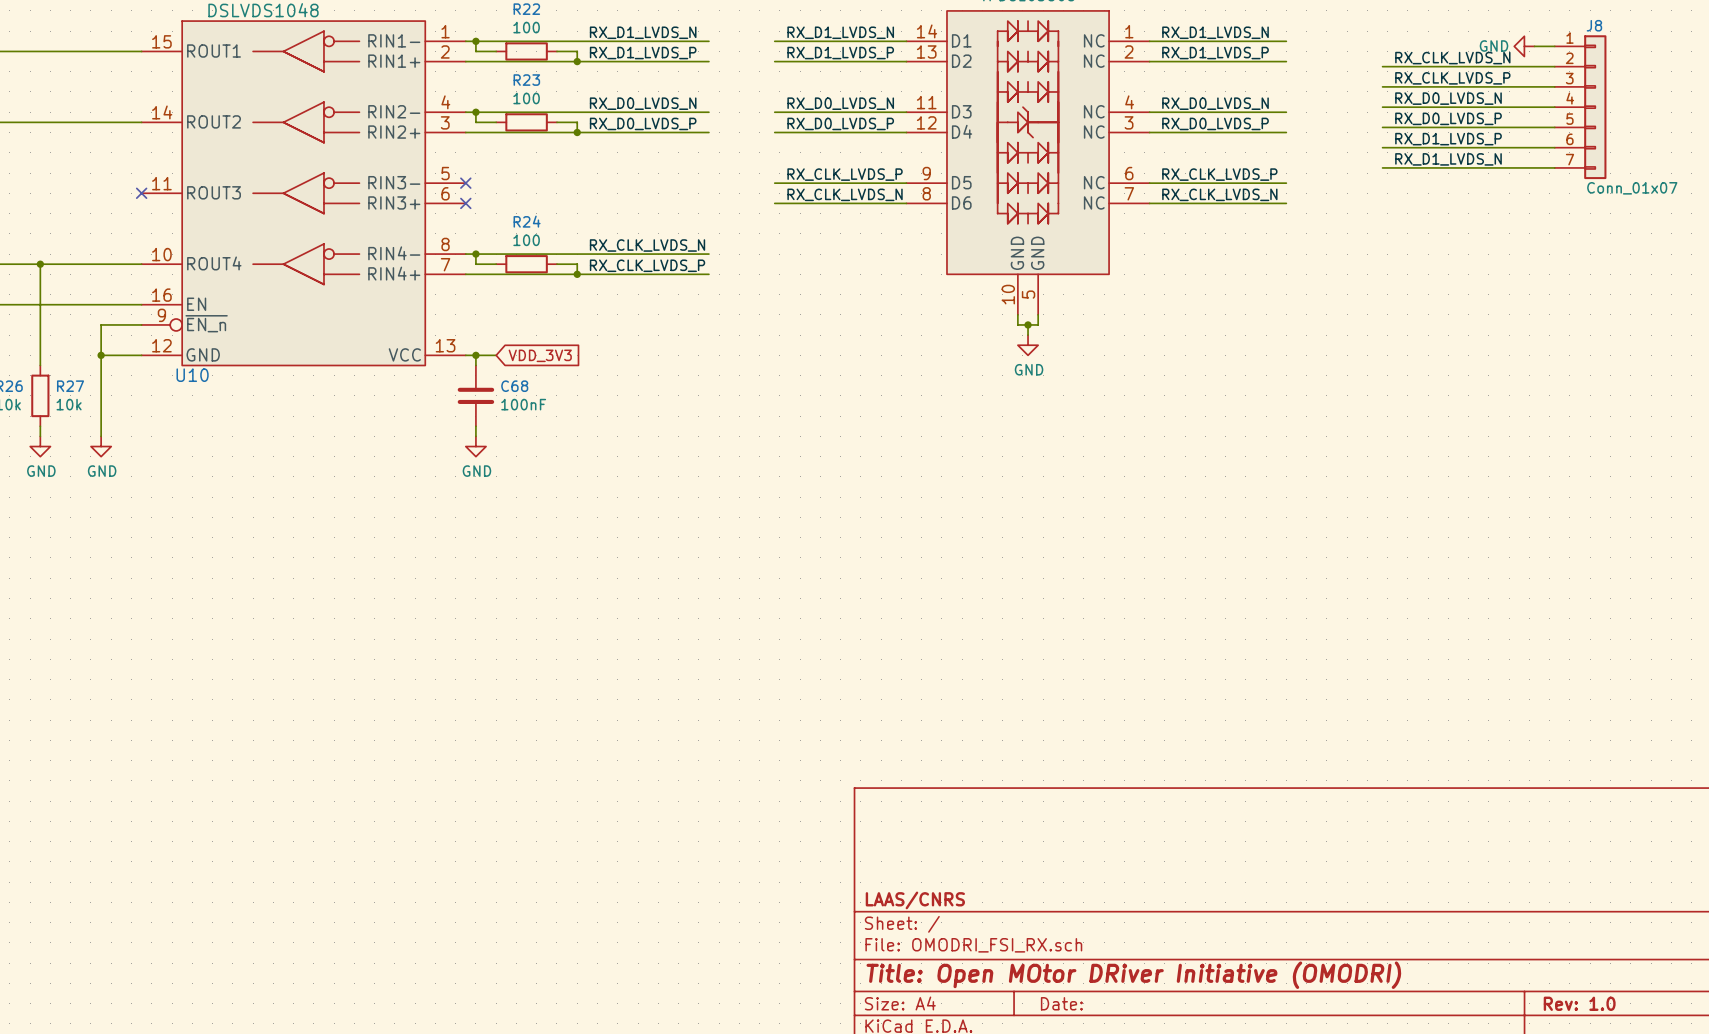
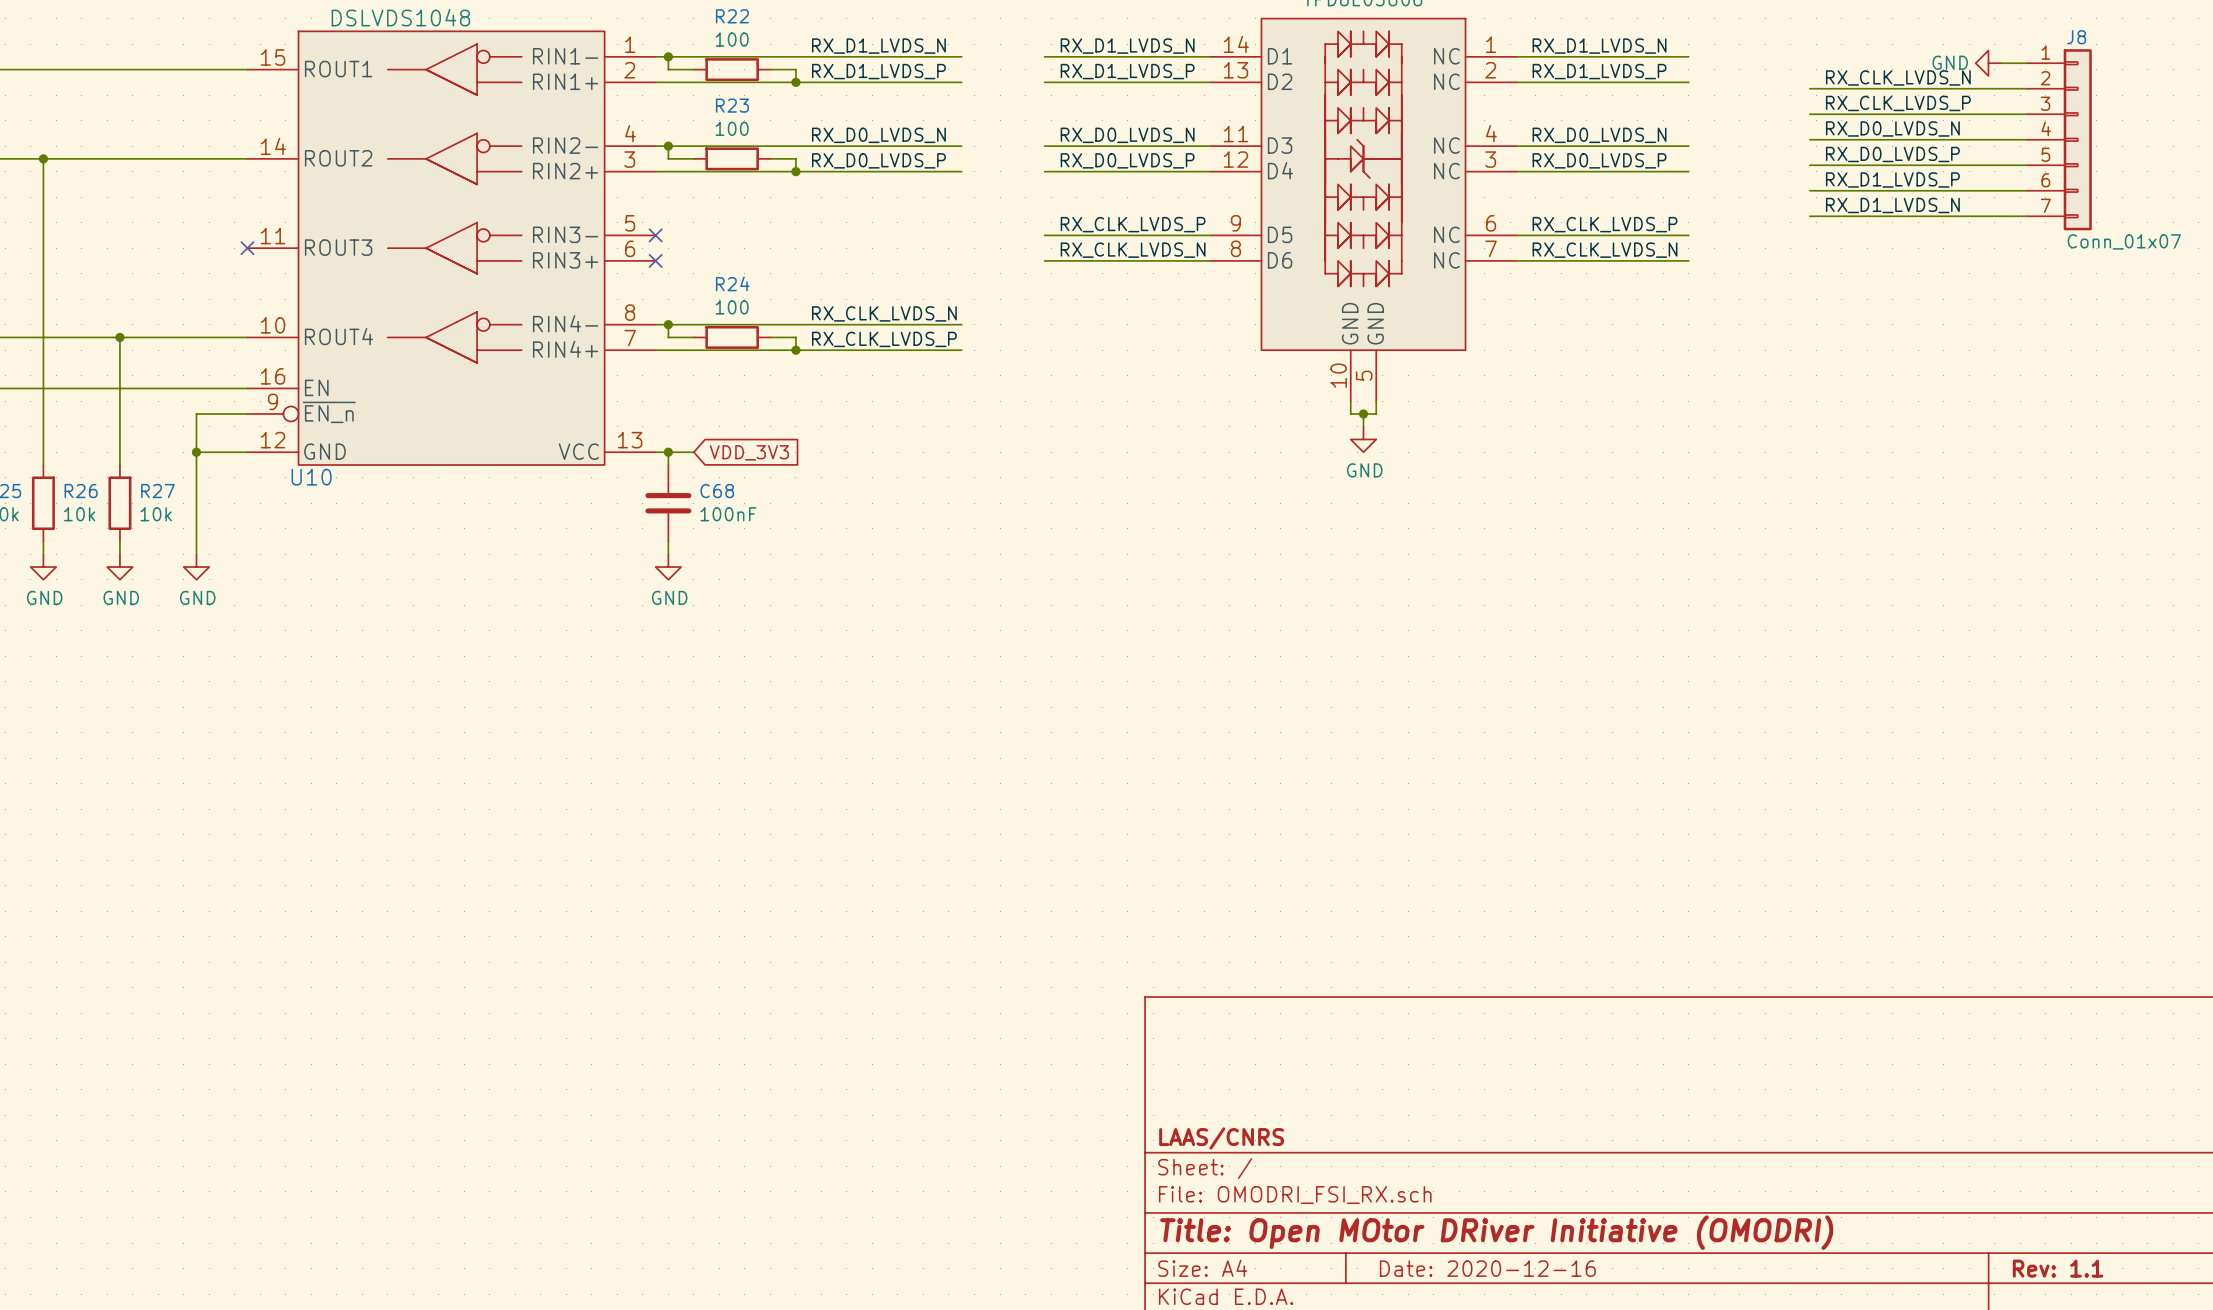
title block: Date: (1061, 1003) -> Date: 2020-12-16 (1487, 1268)
title block: Rev: 1.0 (1579, 1003) -> Rev: 1.1 (2058, 1268)

